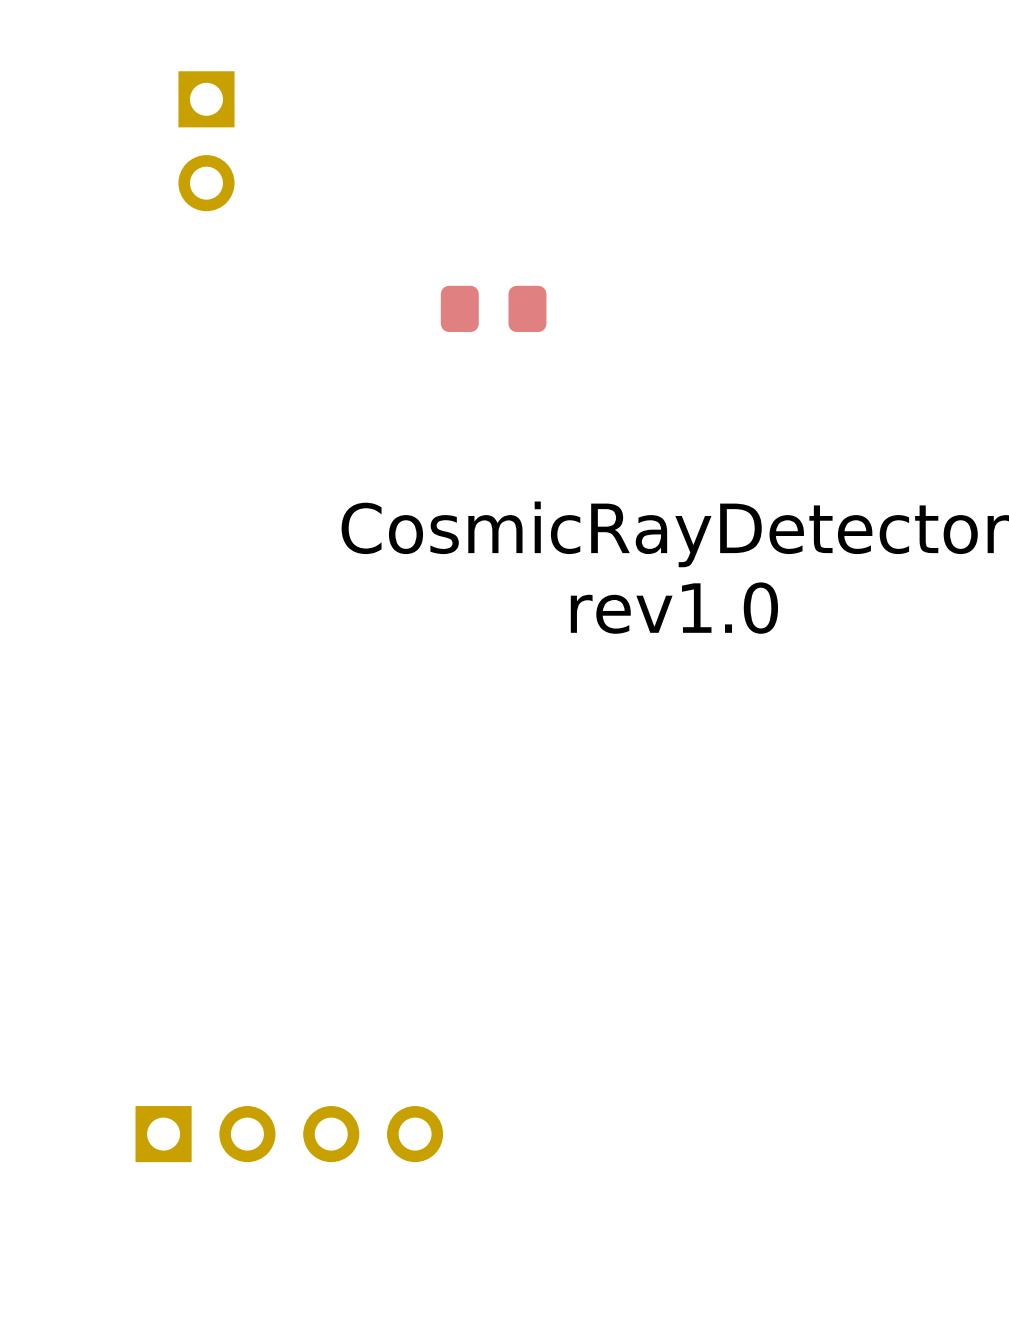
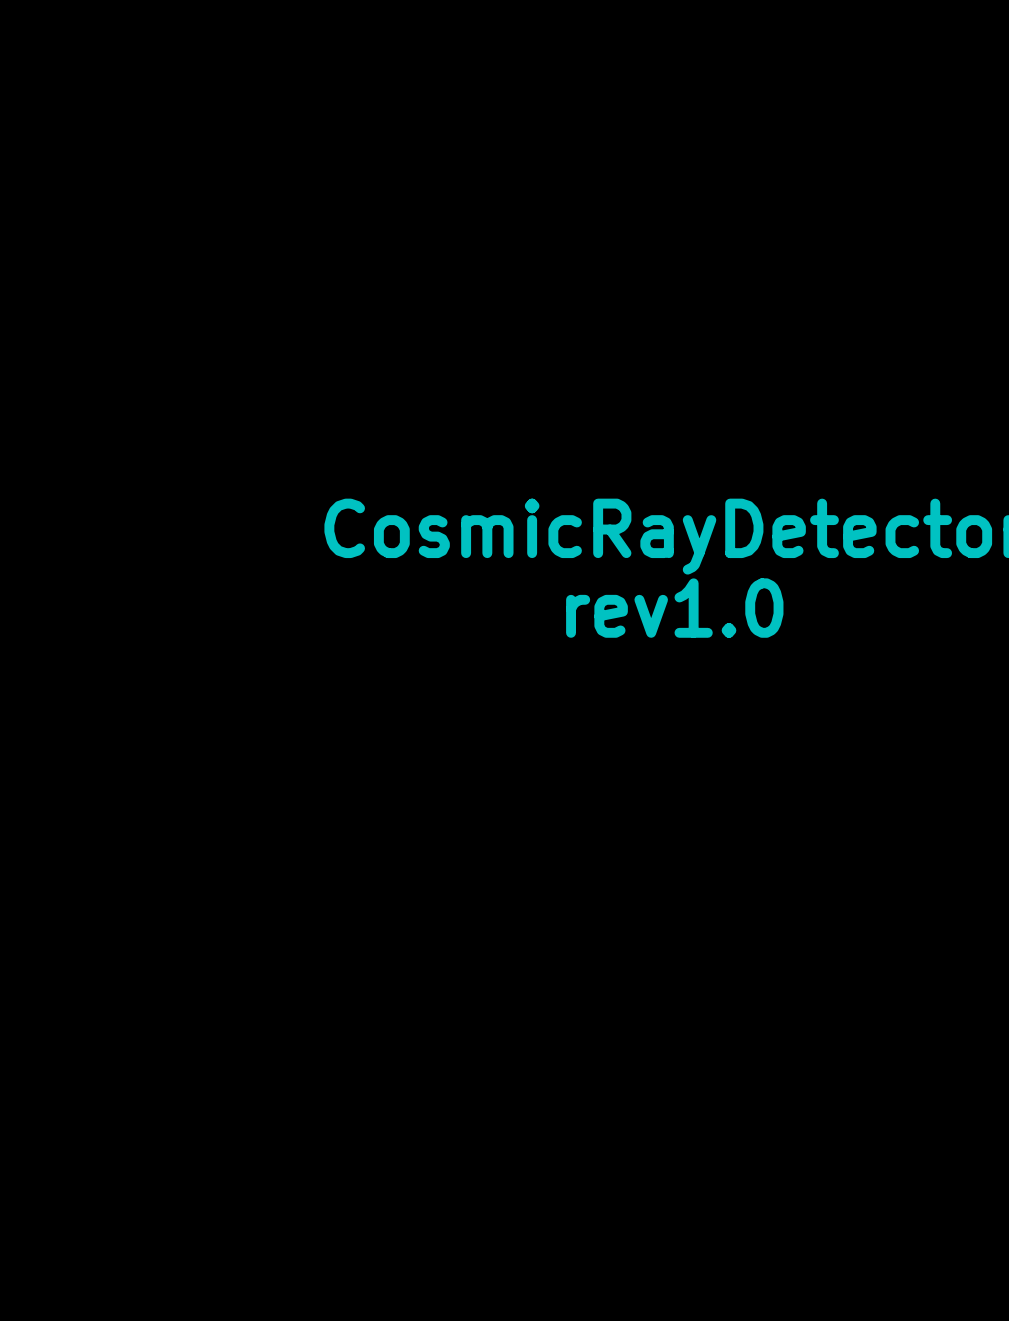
part: (206, 141) -> none
part: (493, 308) -> none
part: (289, 1134) -> none

